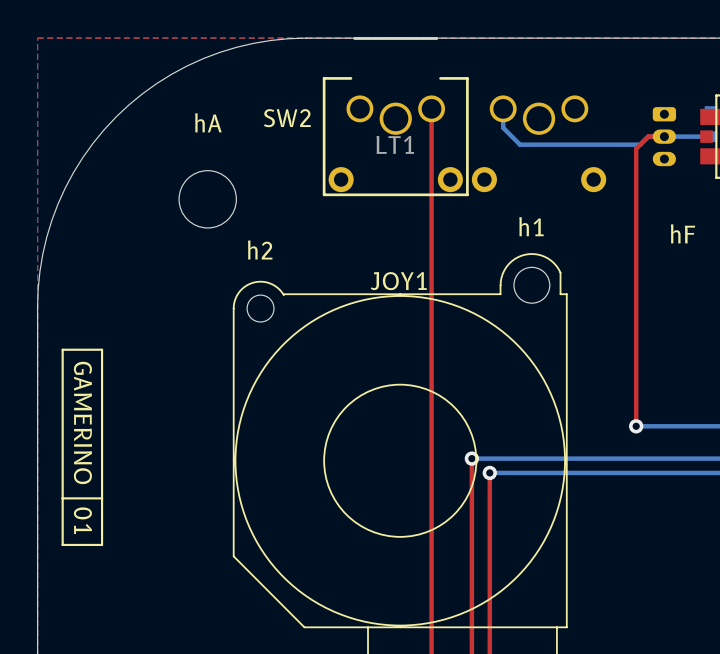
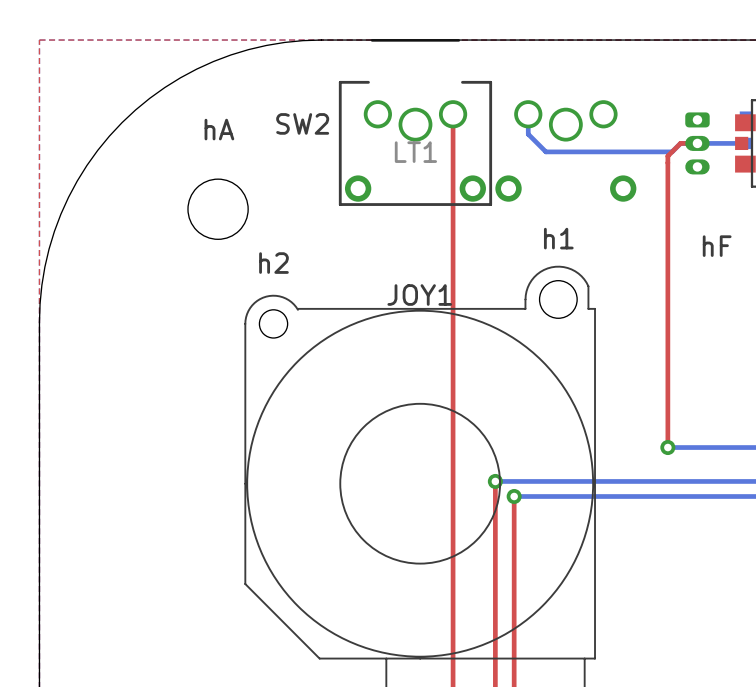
line: (62, 349) (62, 544) (102, 544) (102, 349) (62, 349) -> none
text: GAMERINO (82, 422) -> none
line: (62, 498) (102, 498) -> none
text: 01 (82, 520) -> none

